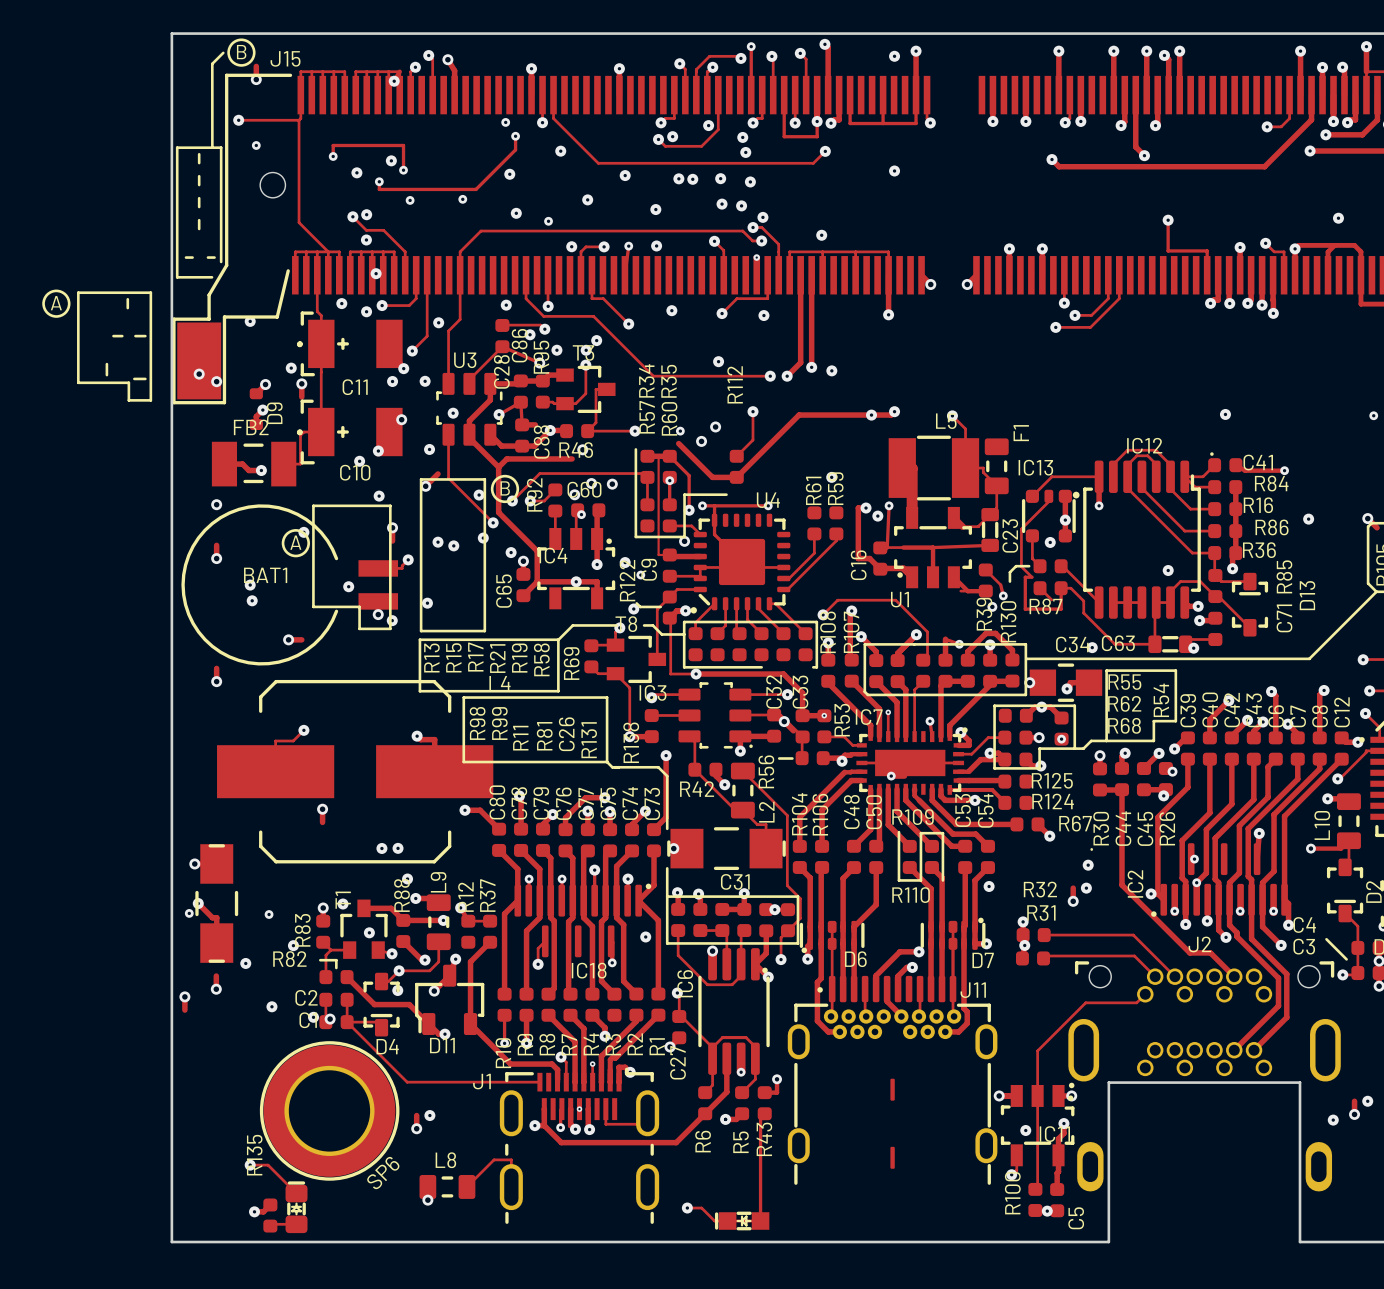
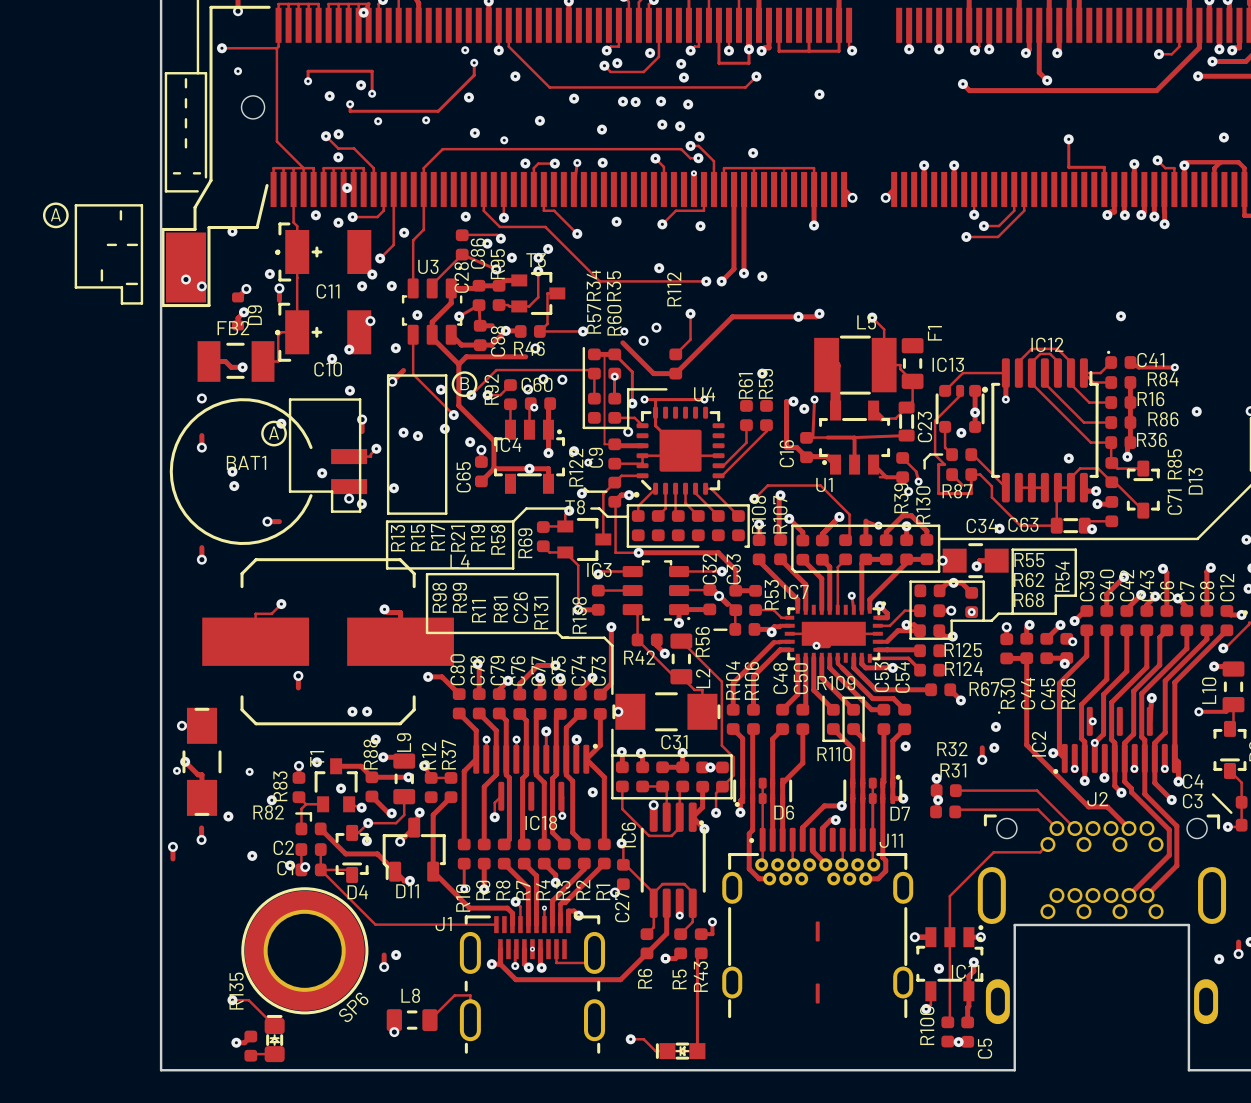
track: (888, 712) (888, 736) -> none
via: (888, 712) -> none
via: (824, 715) -> none

